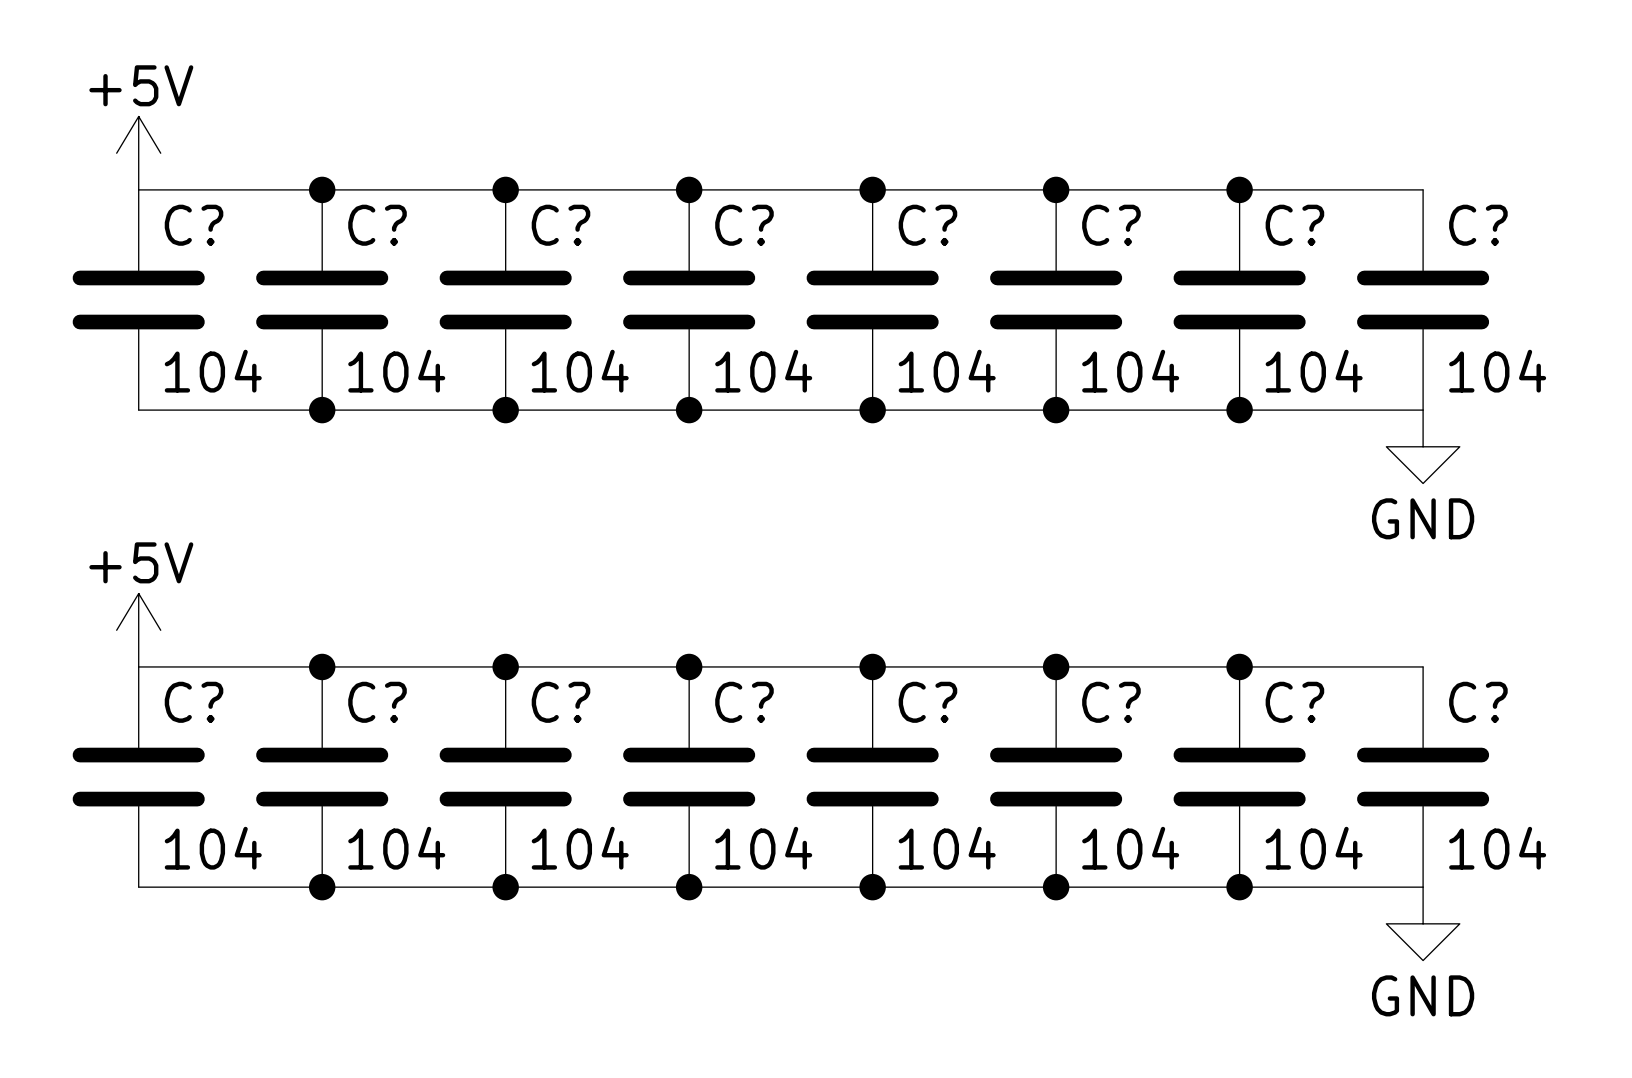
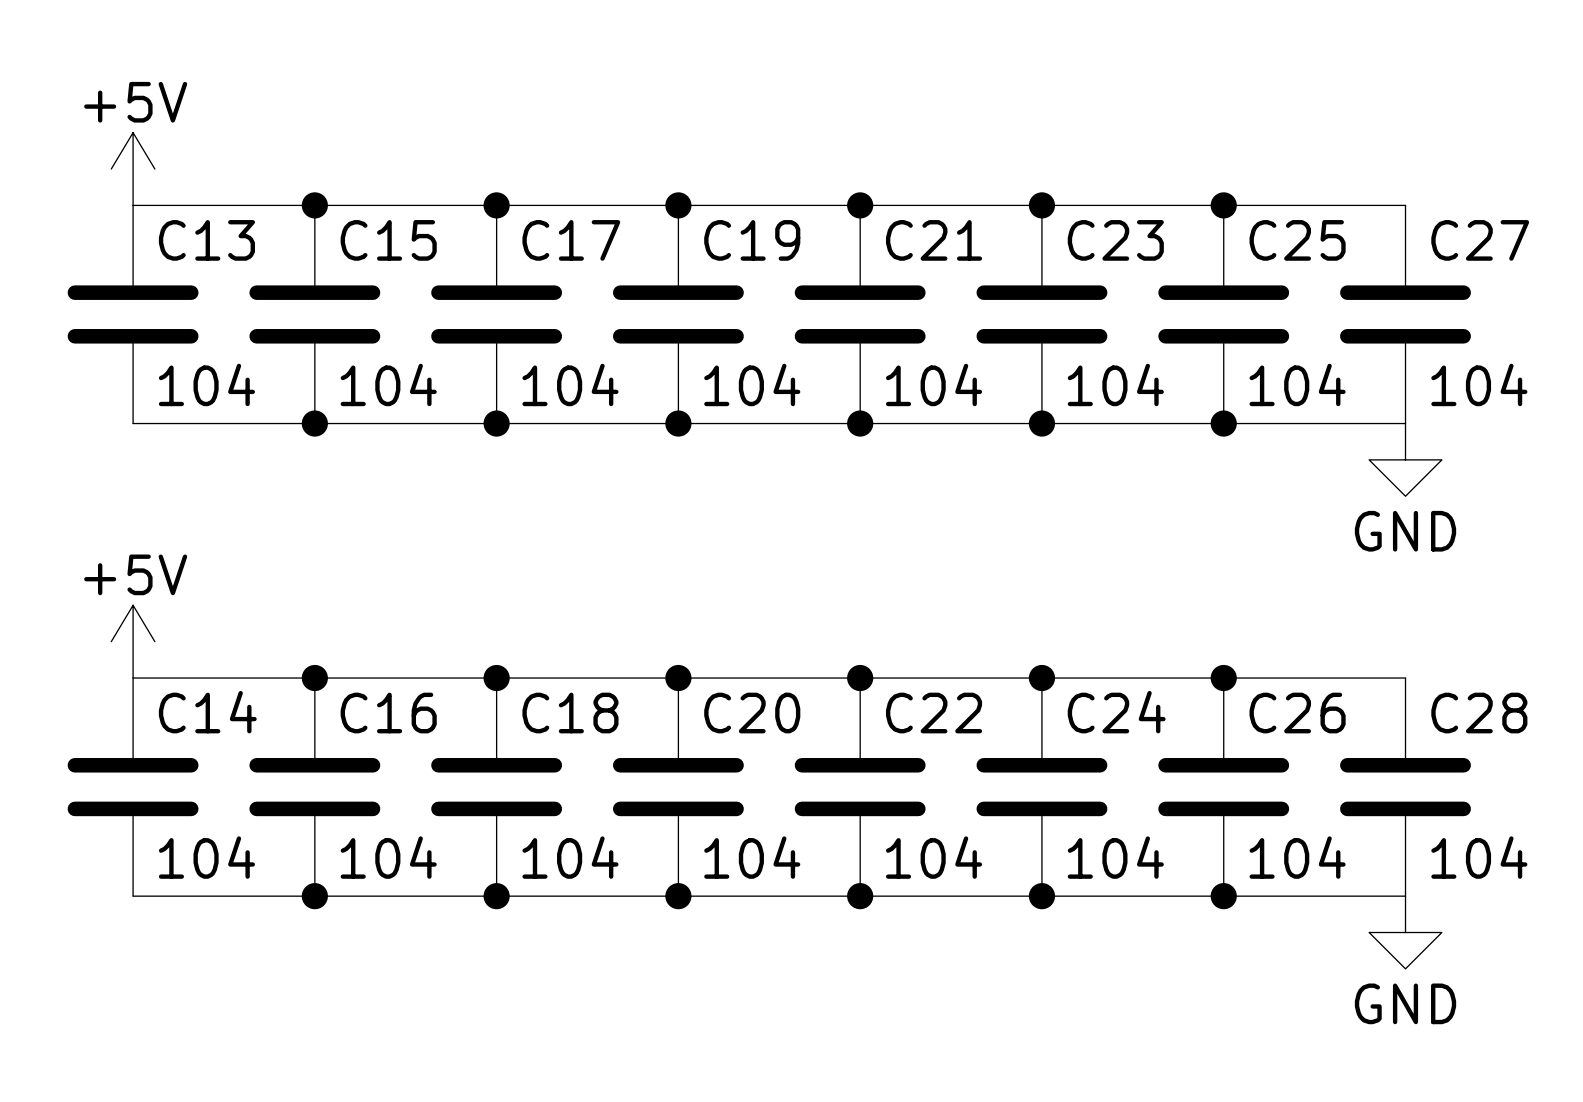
C? name: C? (194, 225) -> C13 (206, 240)
C? name: C? (377, 225) -> C15 (388, 240)
C? name: C? (560, 225) -> C17 (571, 240)
C? name: C? (744, 225) -> C19 (752, 240)
C? name: C? (927, 225) -> C21 (934, 240)
C? name: C? (1111, 225) -> C23 (1115, 240)
C? name: C? (1294, 225) -> C25 (1297, 240)
C? name: C? (1478, 225) -> C27 (1480, 240)
C? name: C? (194, 702) -> C14 (207, 712)
C? name: C? (377, 702) -> C16 (388, 713)
C? name: C? (560, 702) -> C18 (570, 713)
C? name: C? (744, 702) -> C20 (752, 713)
C? name: C? (927, 702) -> C22 (934, 713)
C? name: C? (1111, 702) -> C24 (1116, 712)
C? name: C? (1294, 702) -> C26 (1297, 713)
C? name: C? (1478, 702) -> C28 (1479, 713)

